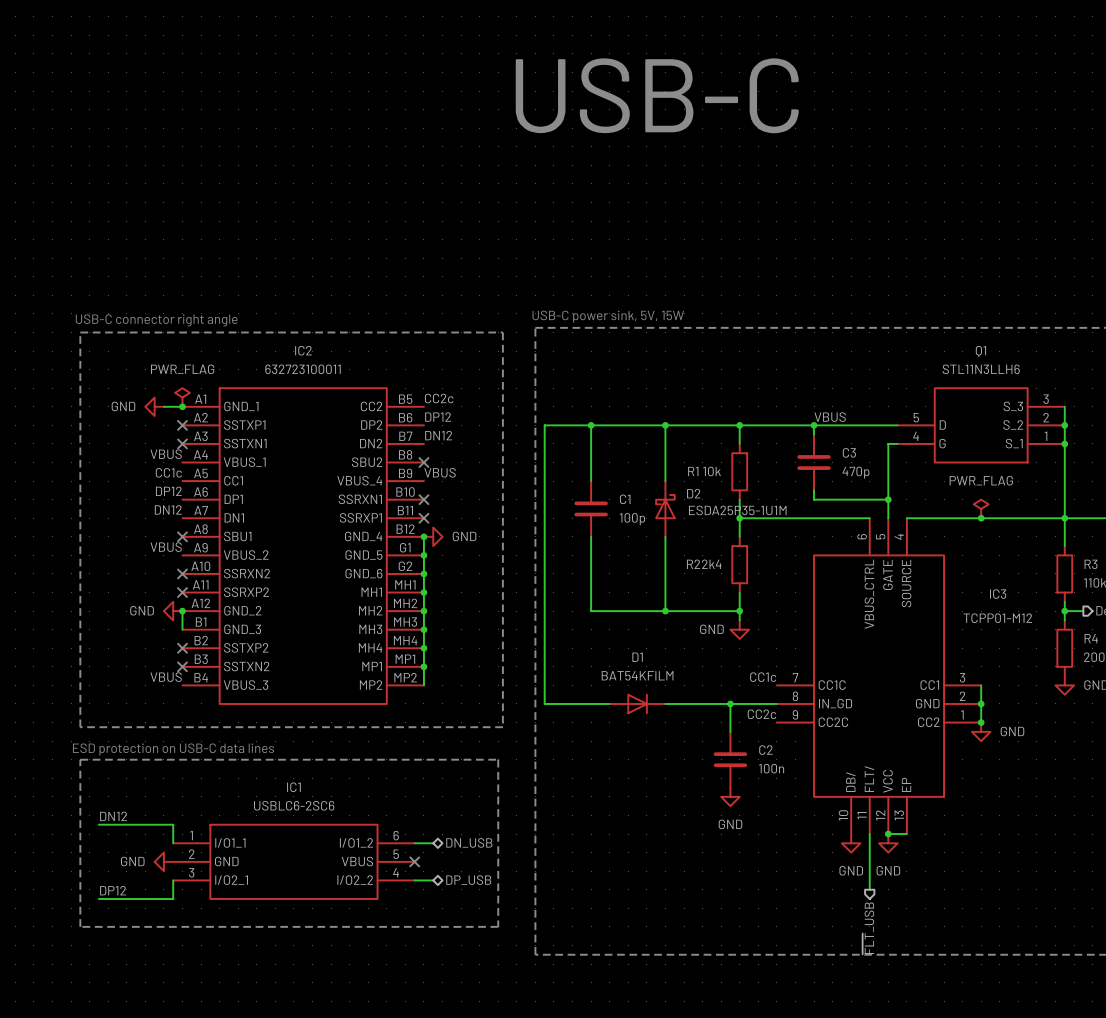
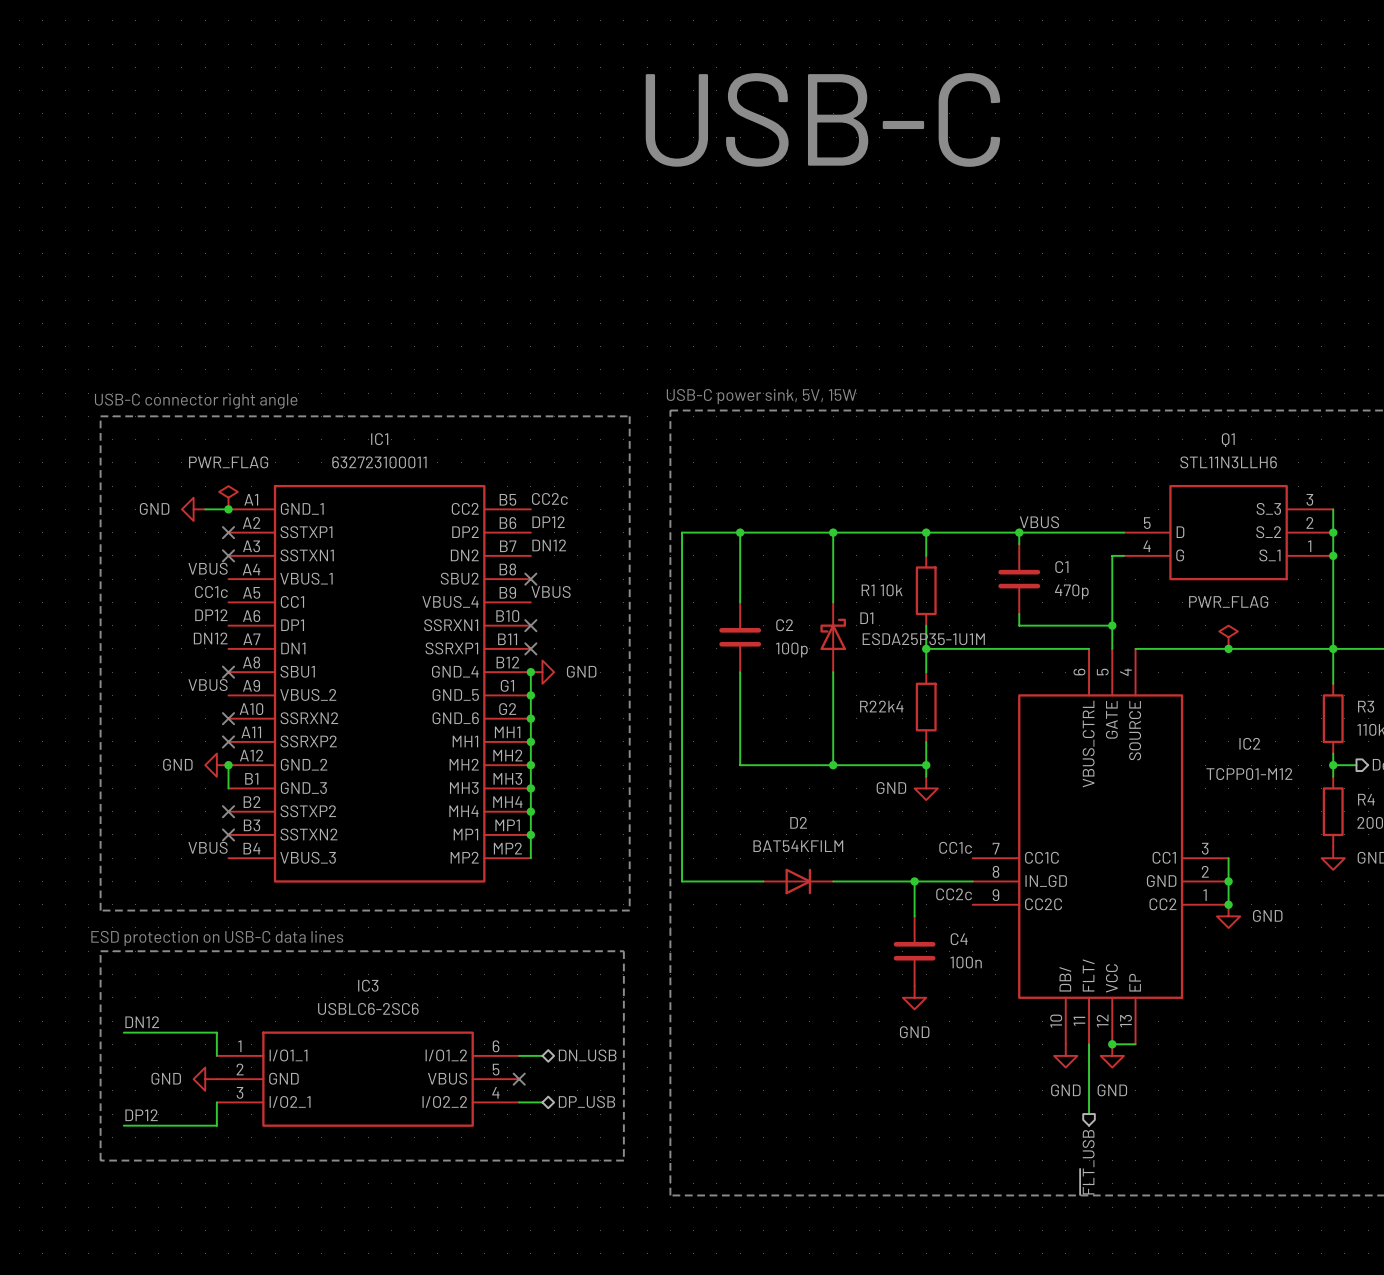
IC2 name: IC2 (303, 350) -> IC1 (379, 439)
C3 name: C3 (849, 452) -> C1 (1061, 567)
D2 name: D2 (693, 493) -> D1 (866, 618)
C1 name: C1 (625, 499) -> C2 (784, 625)
IC3 name: IC3 (998, 594) -> IC2 (1249, 743)
D1 name: D1 (637, 657) -> D2 (798, 822)
C2 name: C2 (765, 750) -> C4 (959, 939)
IC1 name: IC1 (293, 787) -> IC3 (368, 985)

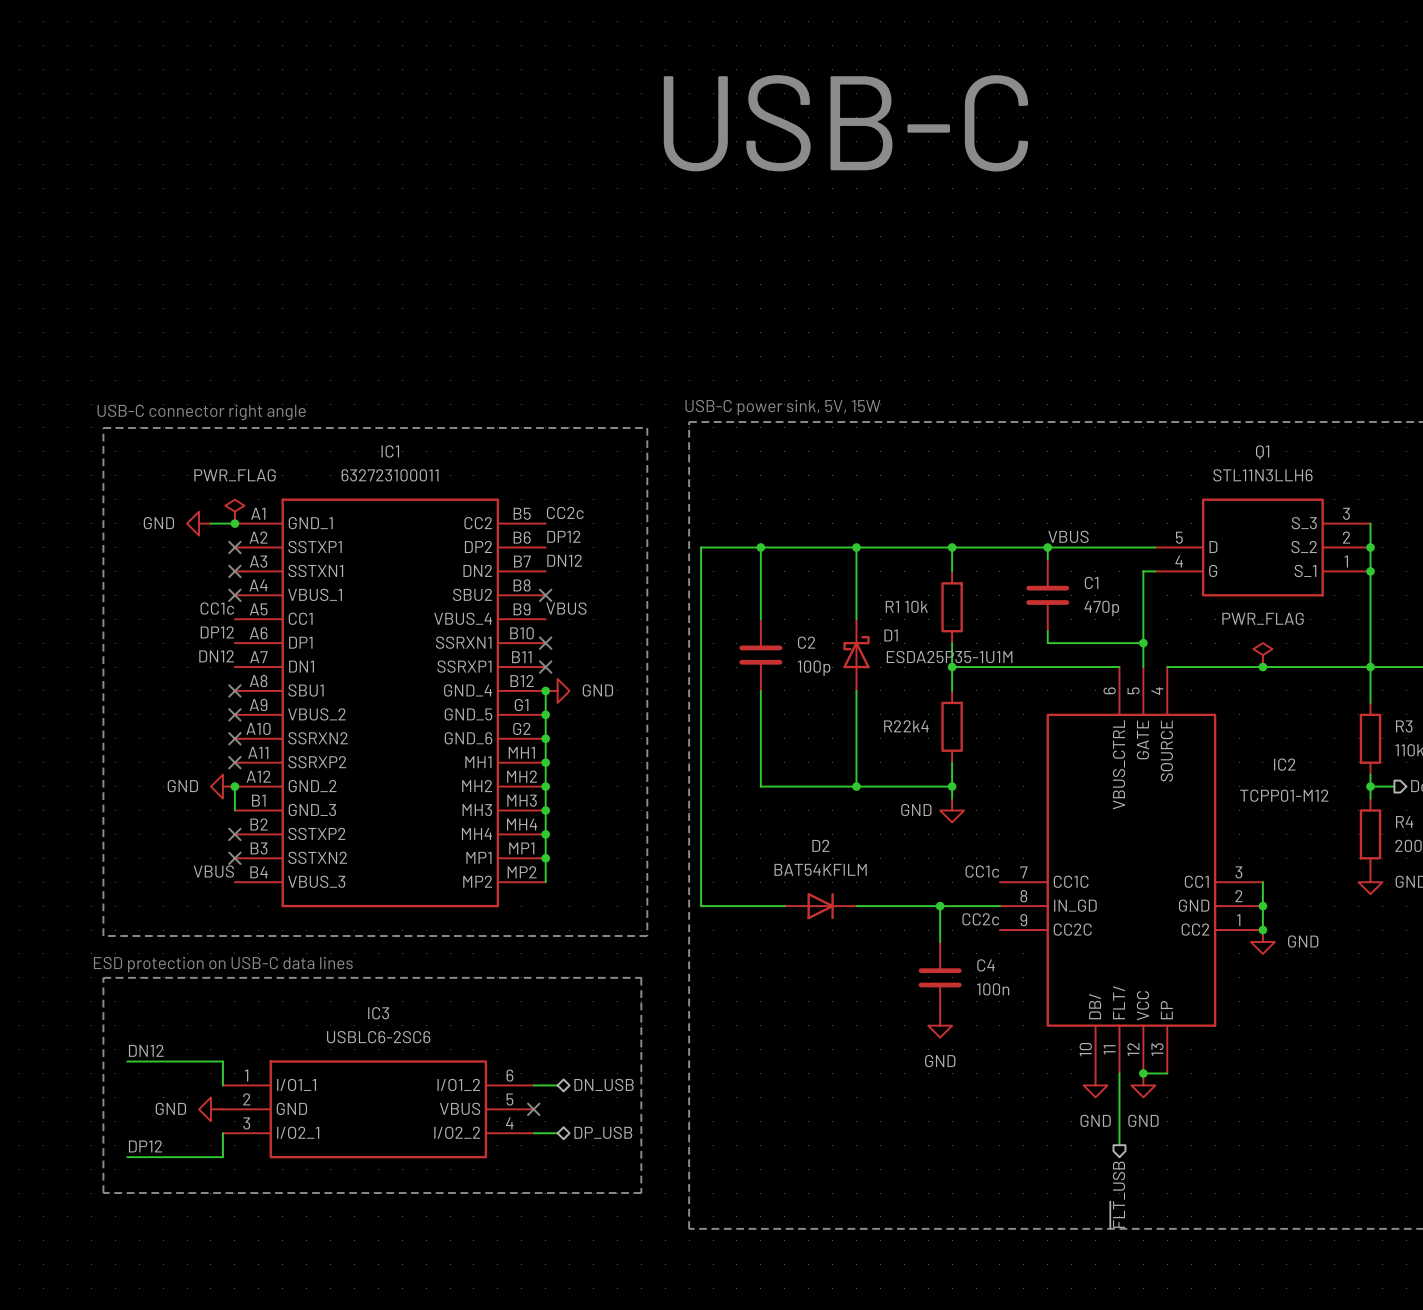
label: VBUS (208, 568) -> none
no-connect mark: none -> (234, 595)
label: VBUS (208, 685) -> none
no-connect mark: none -> (234, 714)

